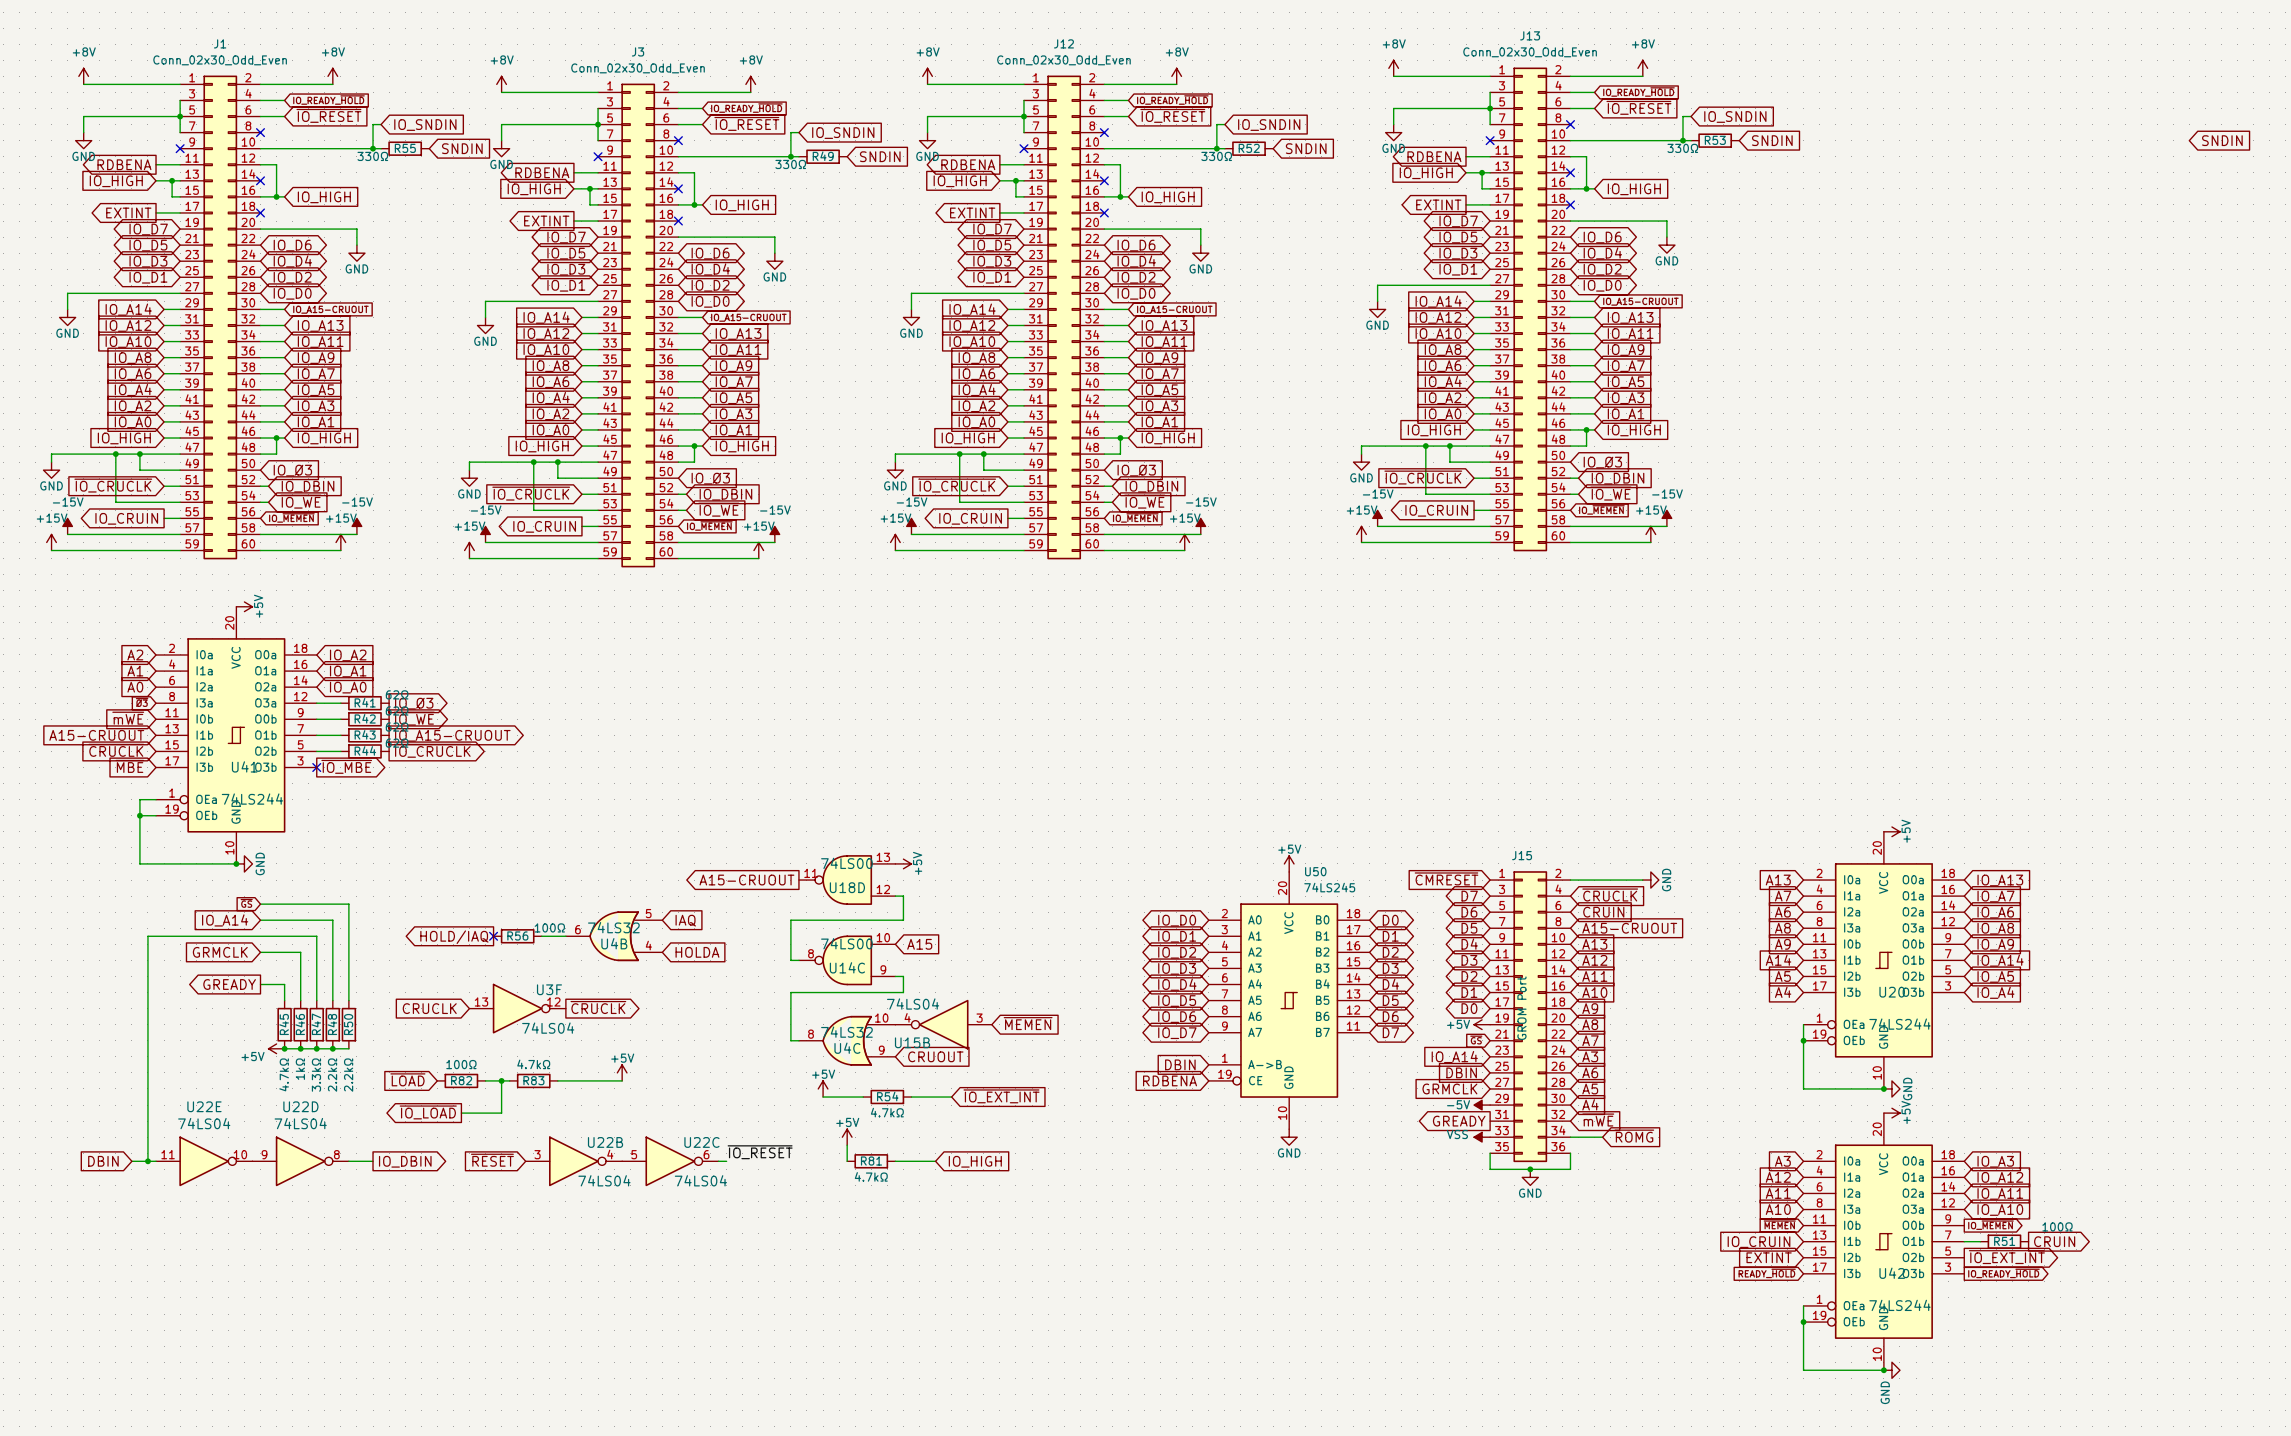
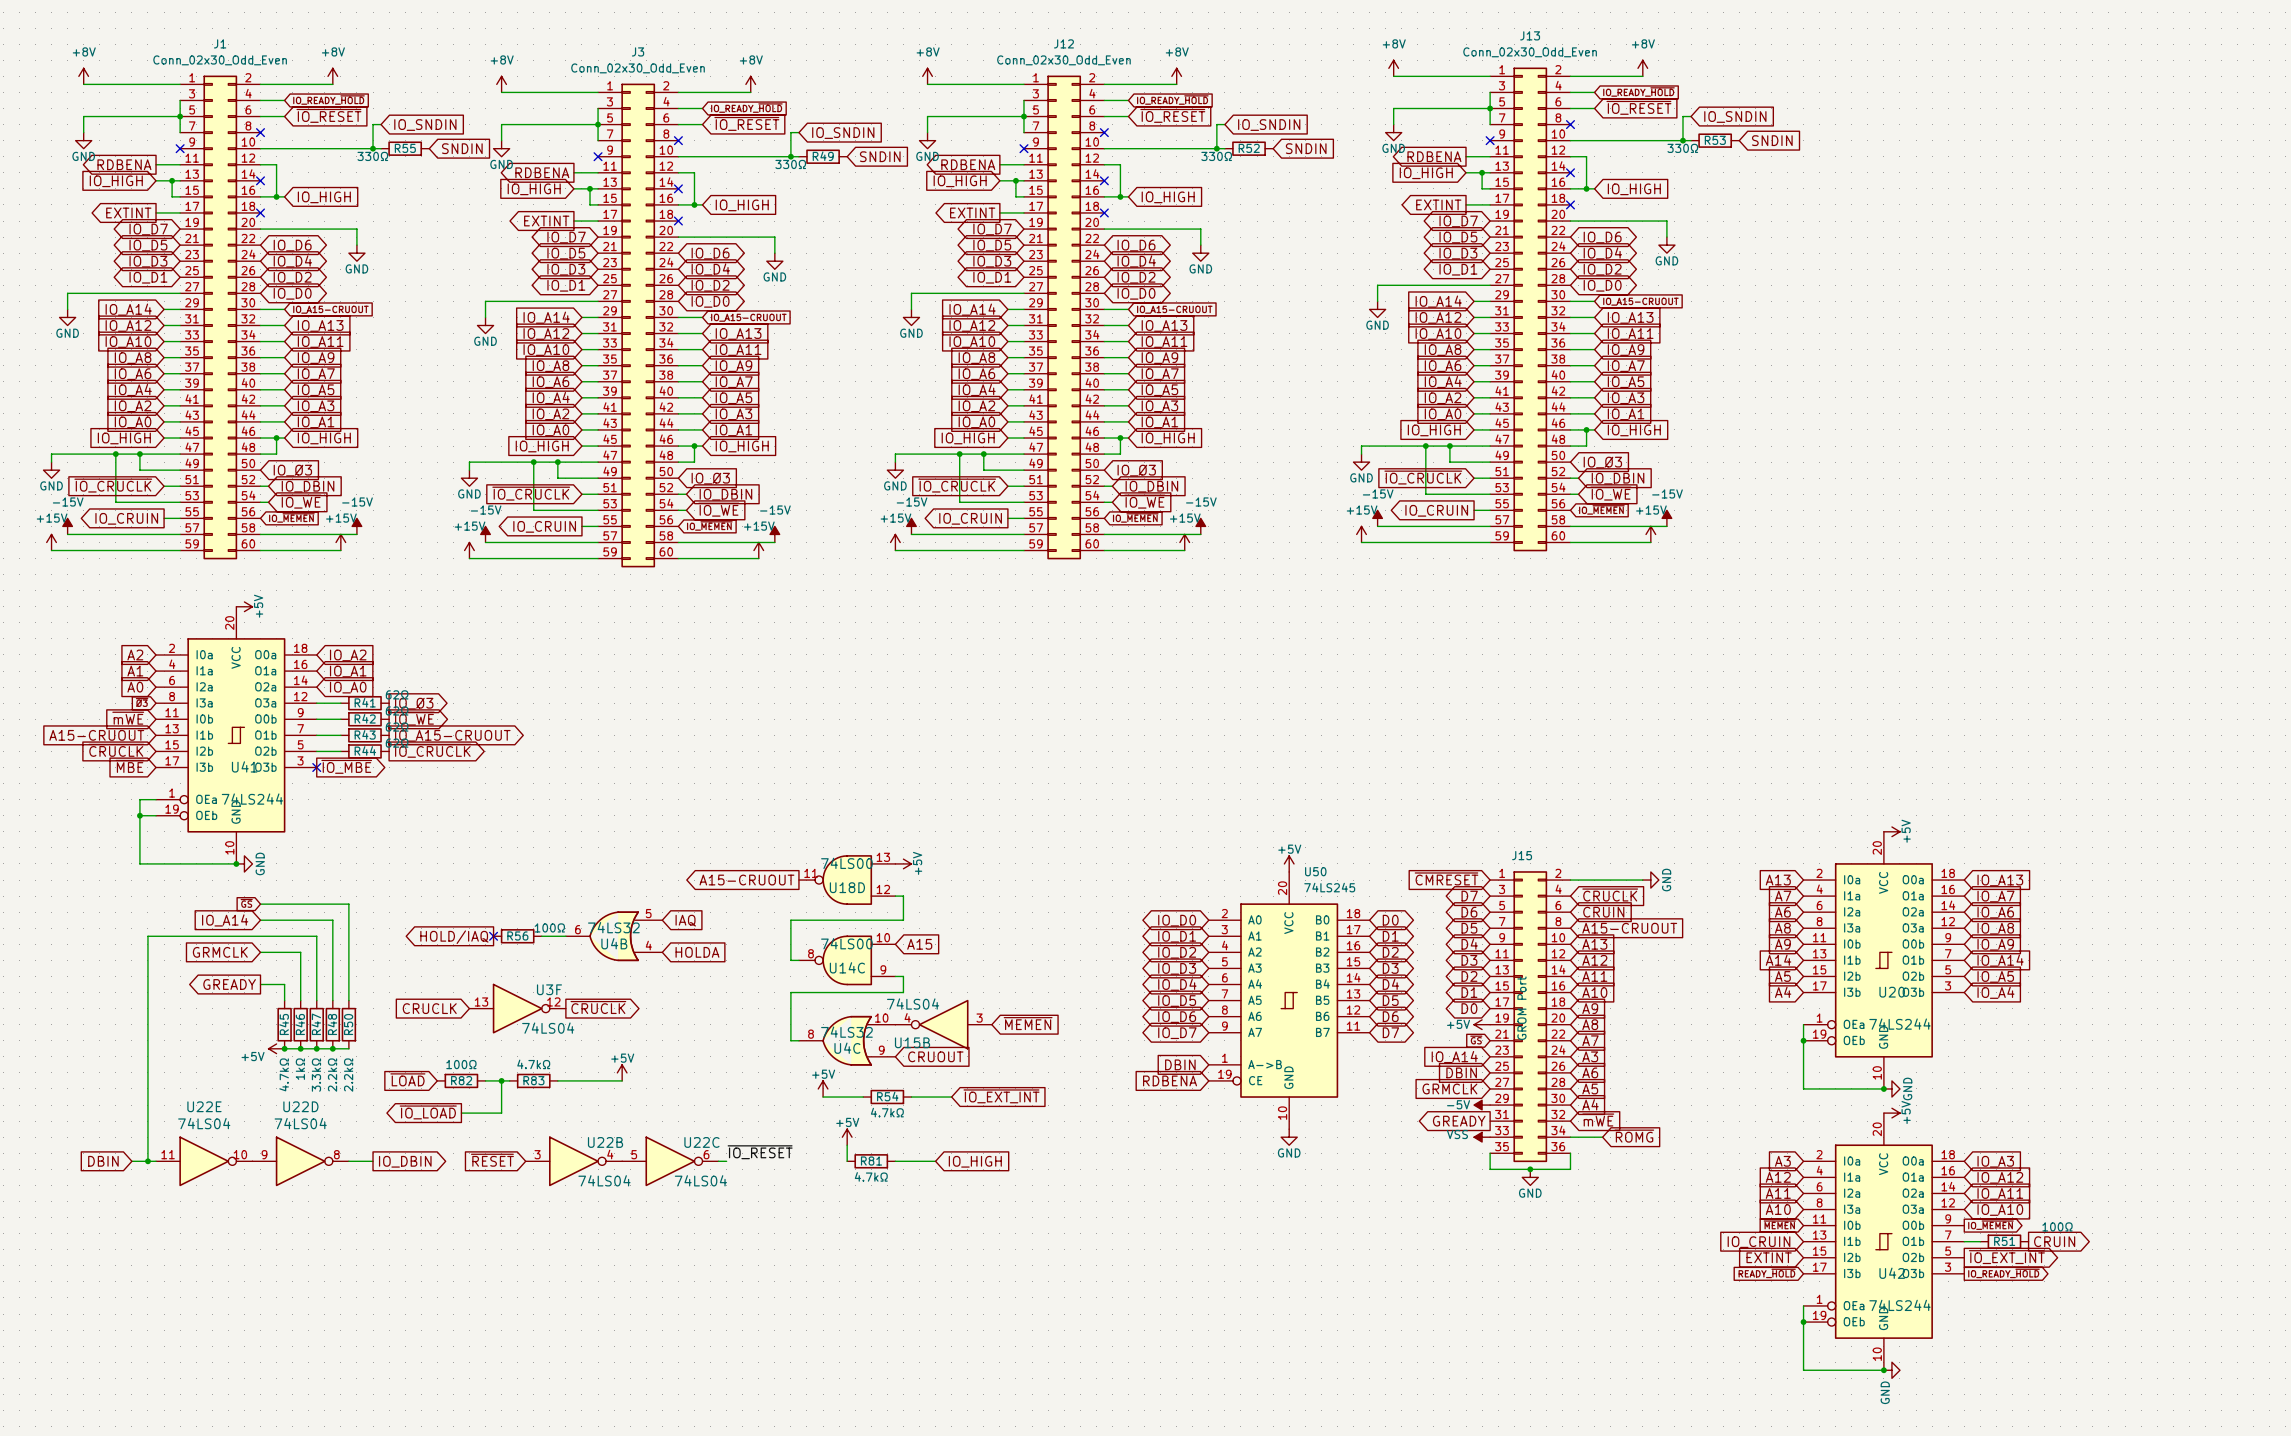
global label: SNDIN (2222, 140) -> none

